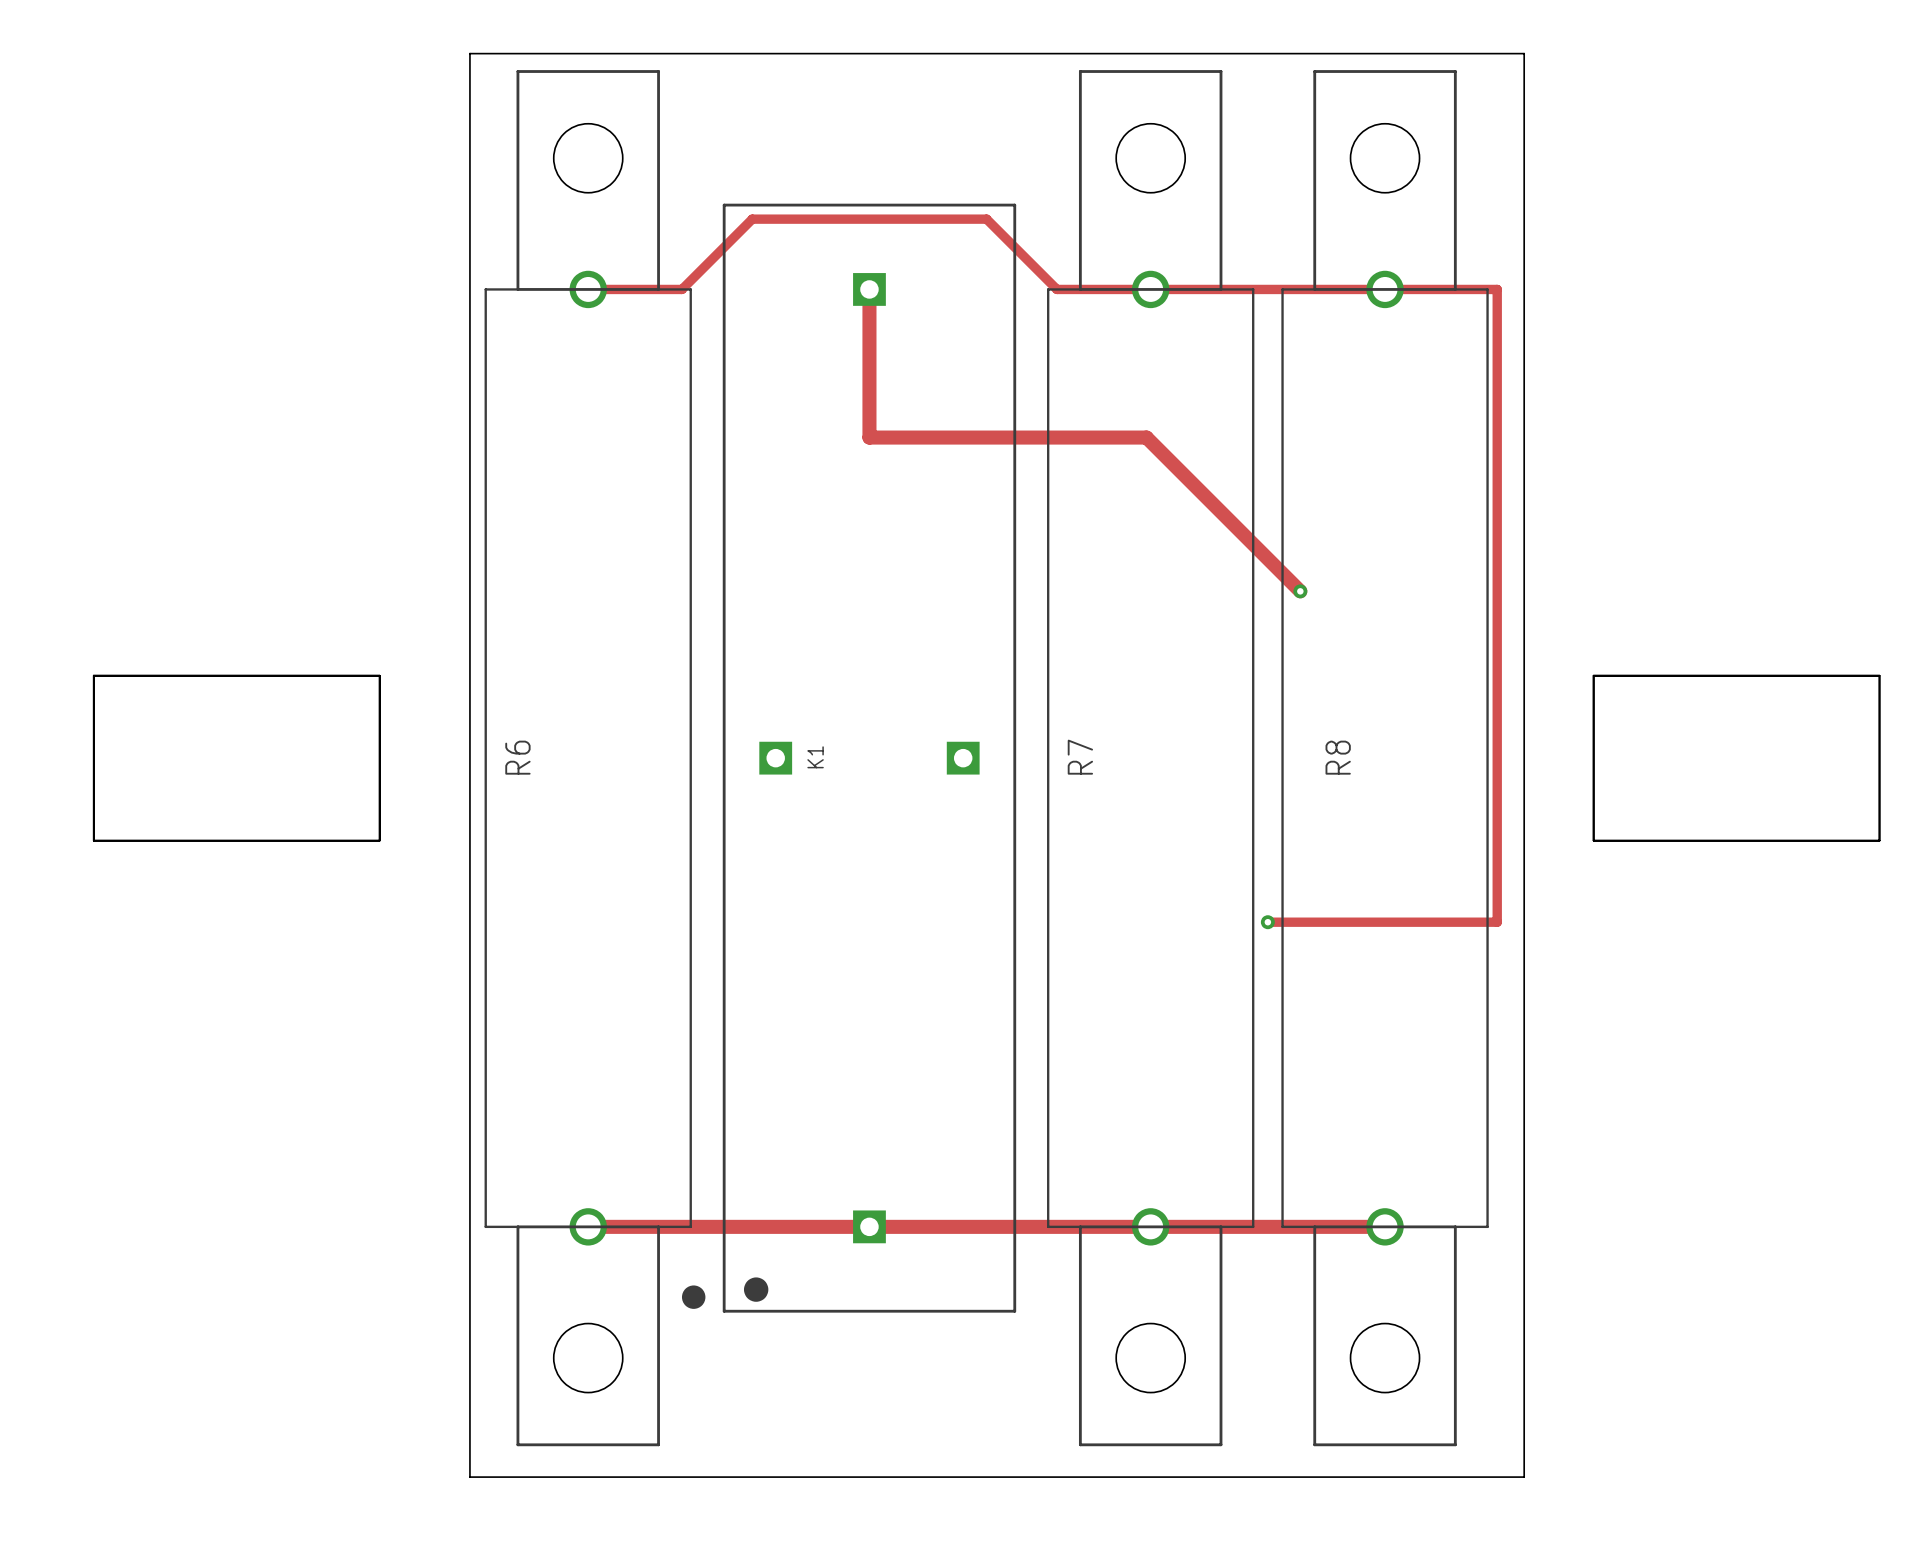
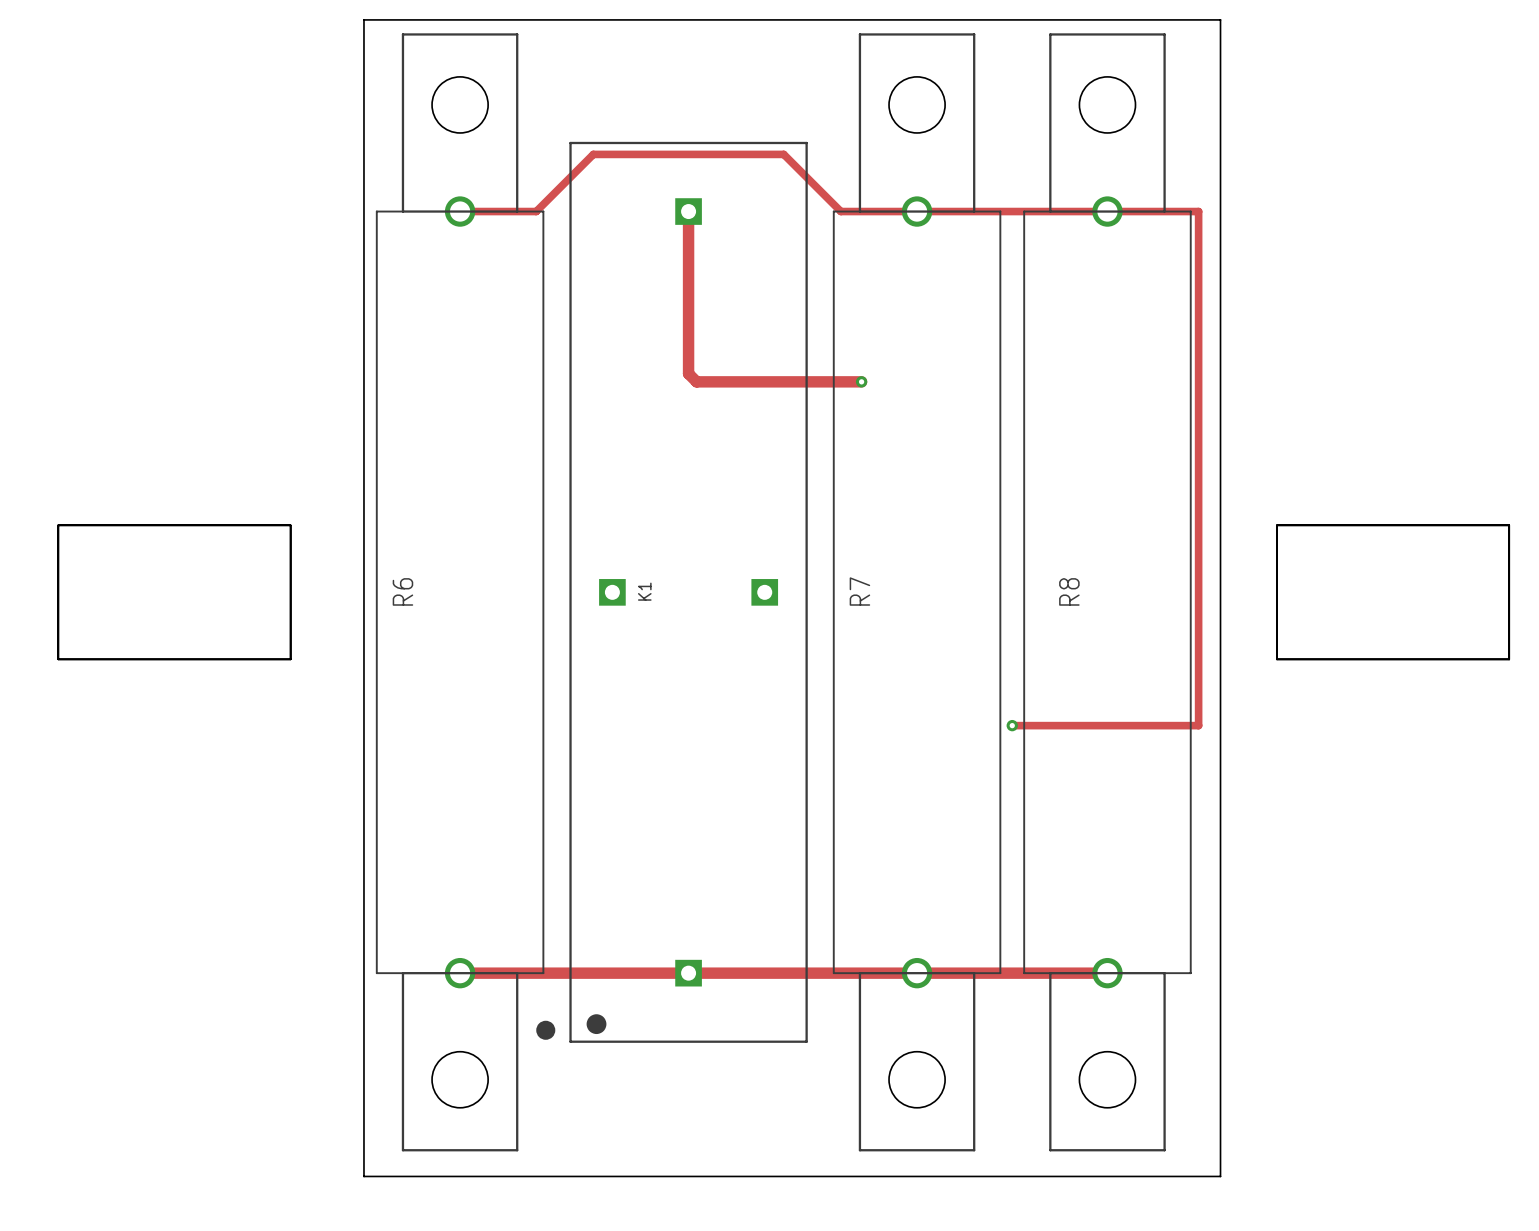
track: (869, 437) (1146, 437) (1300, 591) -> (688, 331) (688, 373) (696, 381) (861, 381)
via: none -> (861, 381)
via: (1300, 591) -> none

